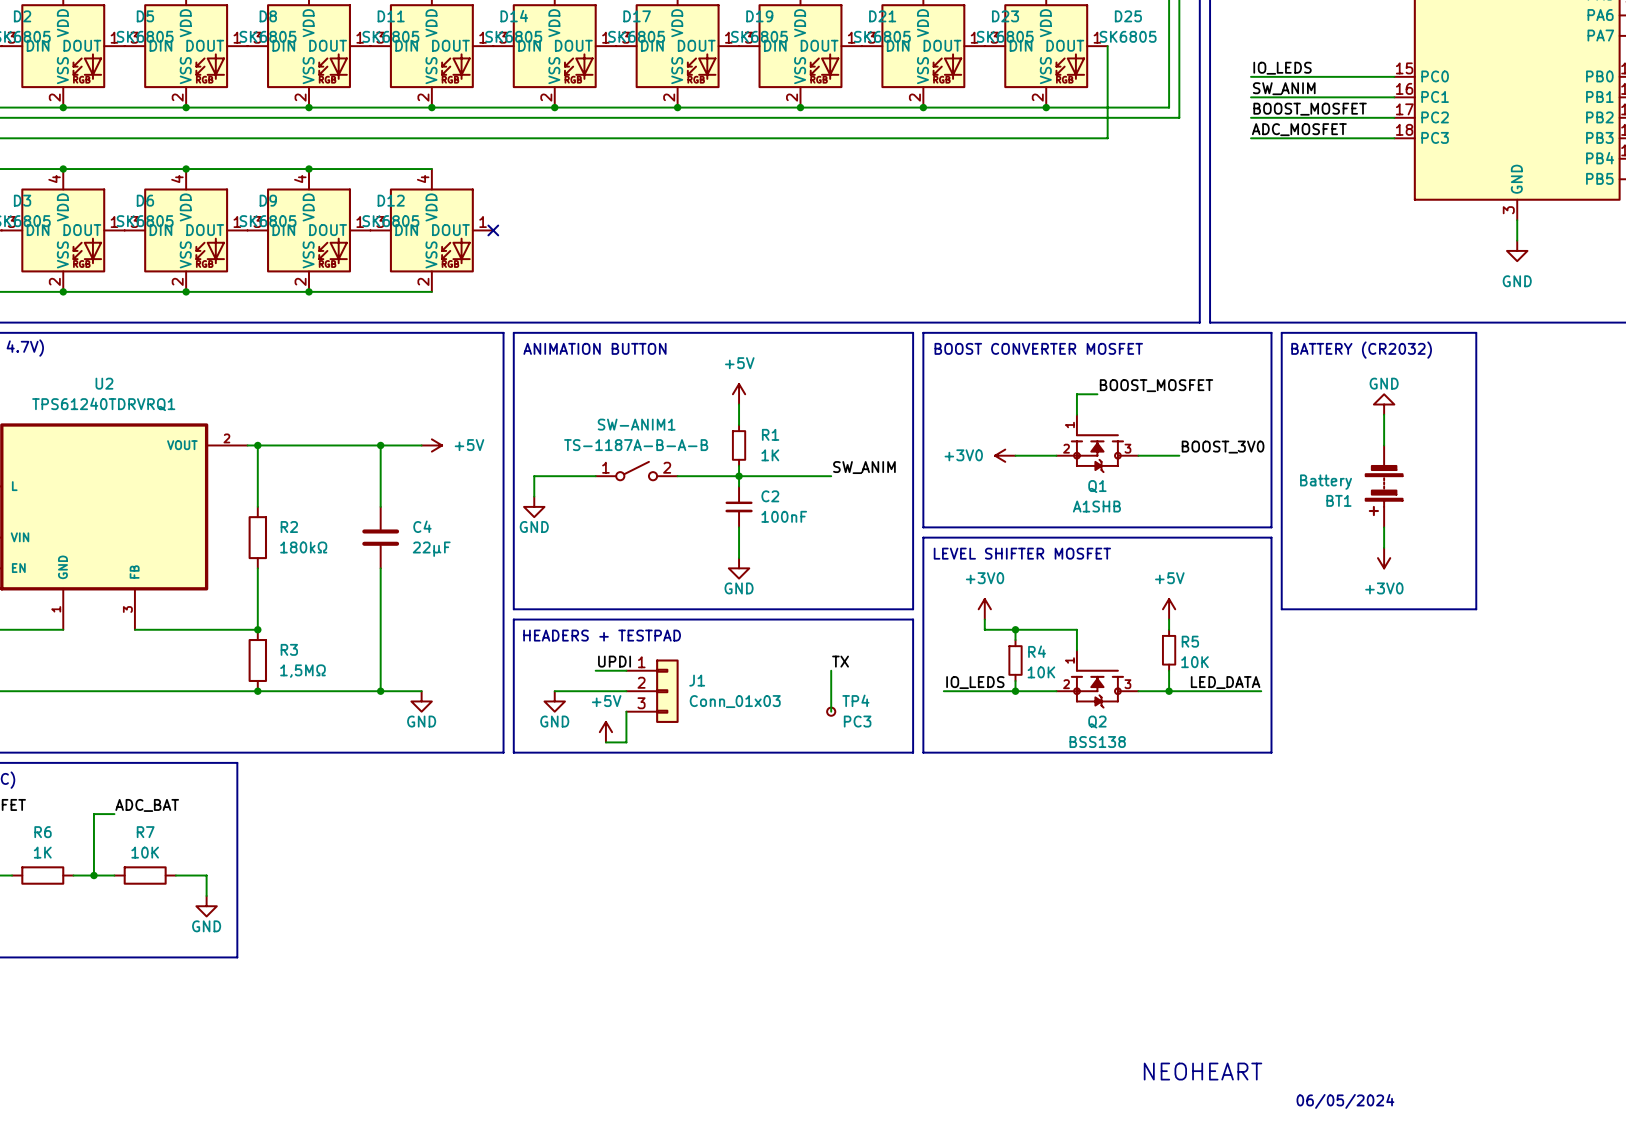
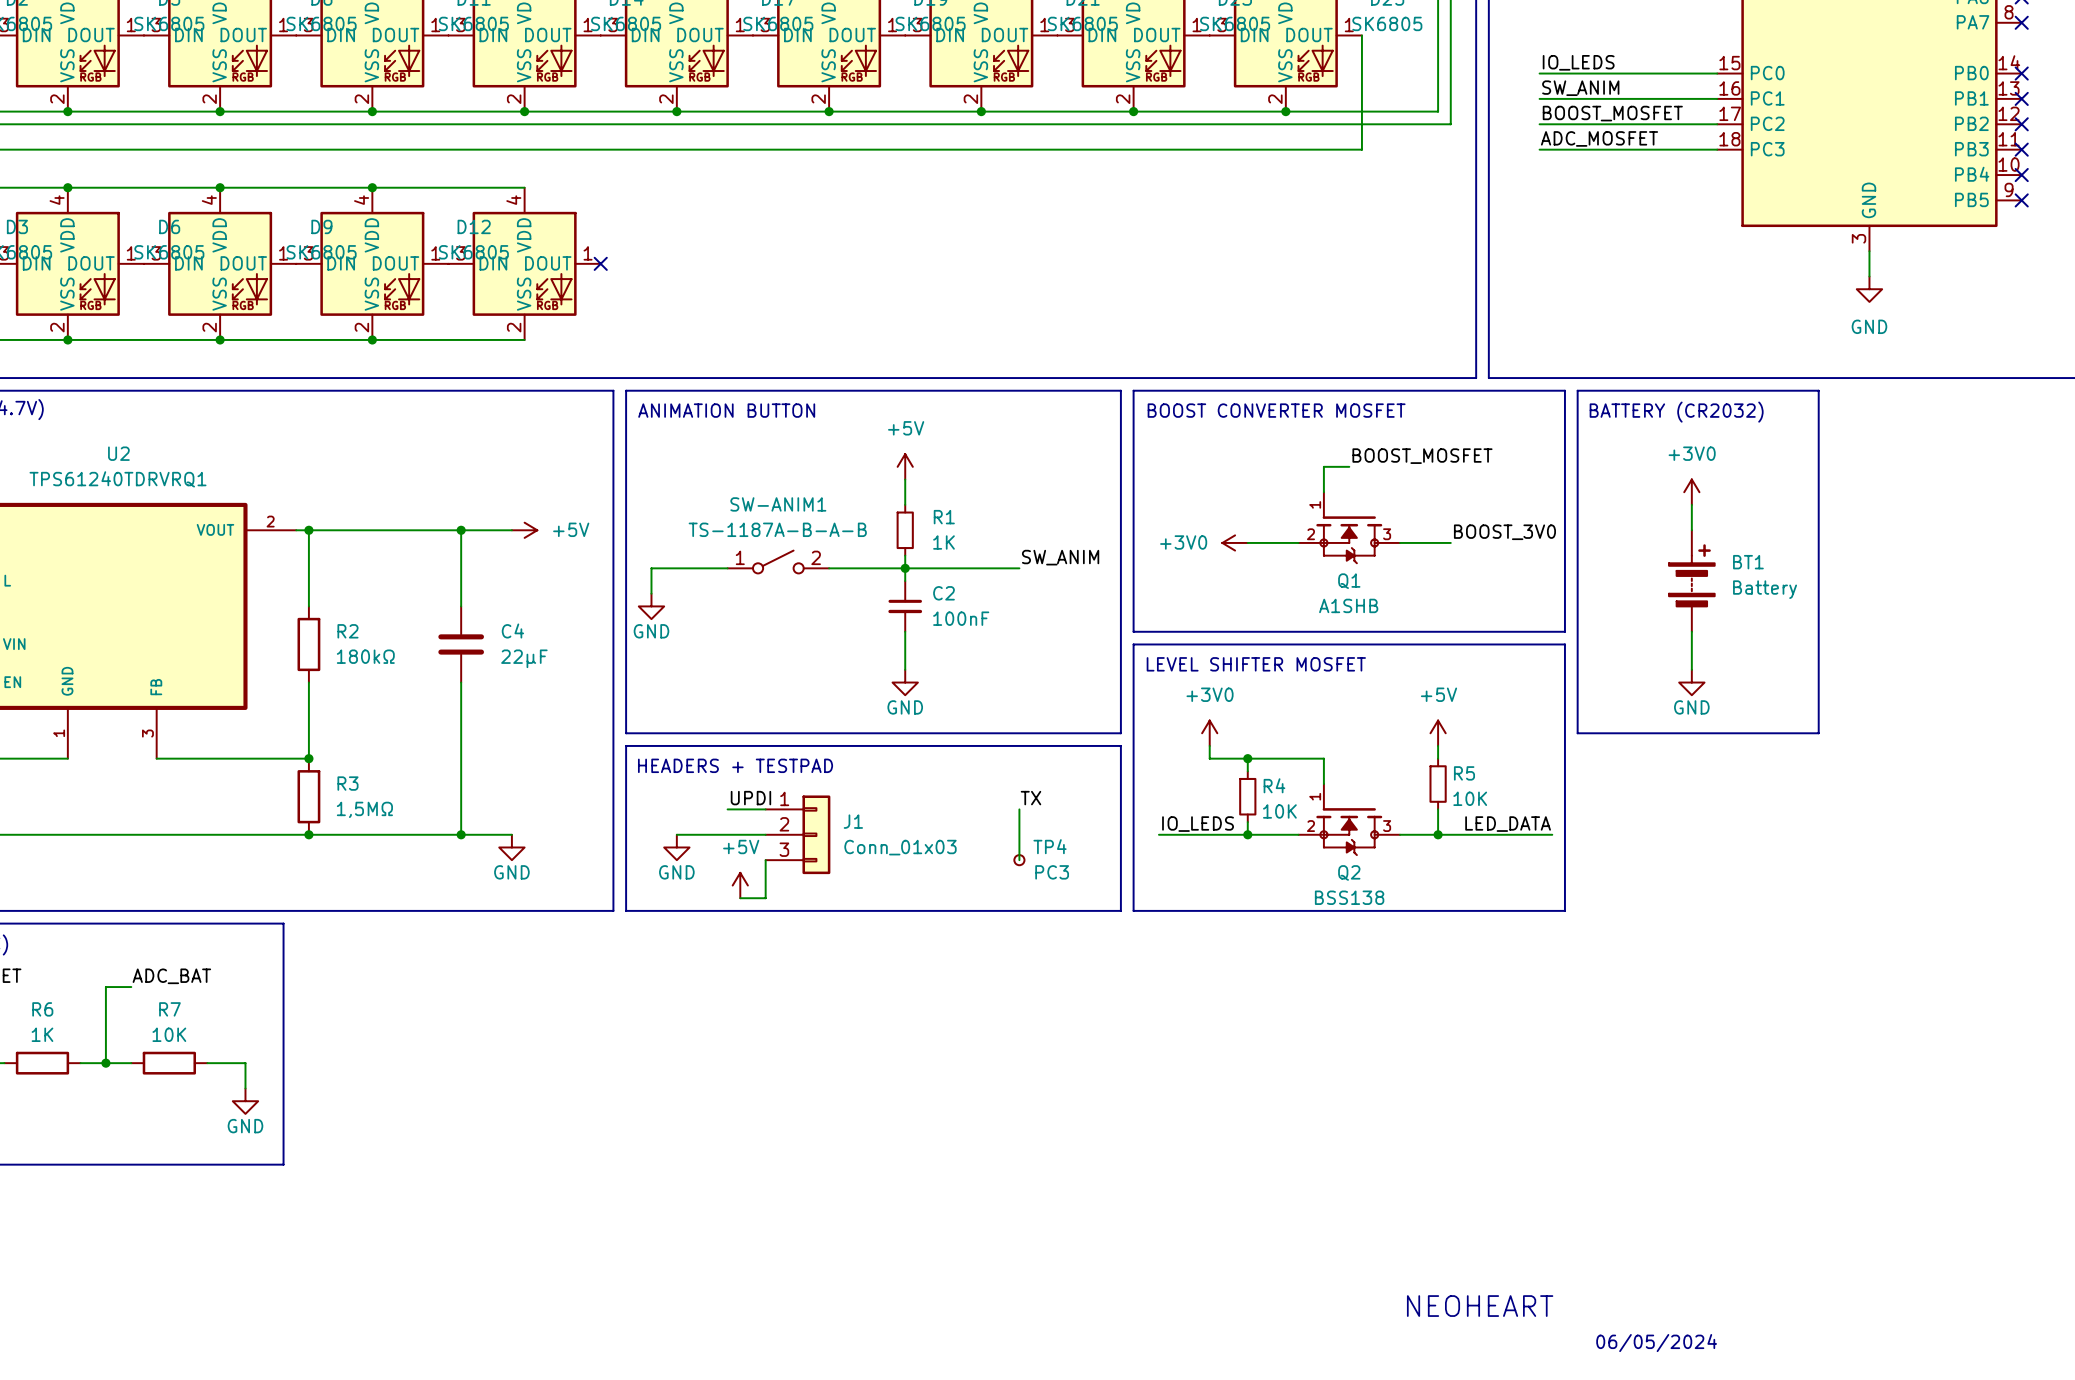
power symbol rotation: 0° (1384, 404) -> 180° (1691, 682)
power symbol position: GND (1384, 404) -> GND (1691, 682)
wire: (1384, 414) (1384, 445) -> (1691, 631) (1691, 669)
BT1 rotation: 0° (1384, 491) -> 180° (1691, 575)
wire: (1384, 527) (1384, 547) -> (1691, 504) (1691, 530)
power symbol rotation: 0° (1384, 558) -> 180° (1691, 492)
power symbol position: +3V0 (1384, 558) -> +3V0 (1691, 492)

